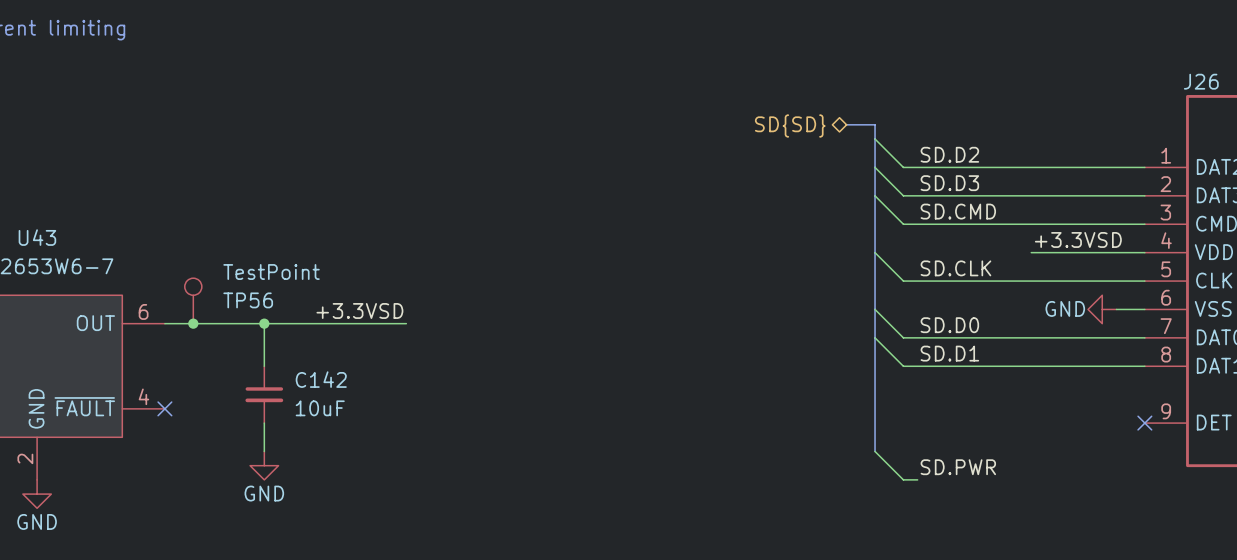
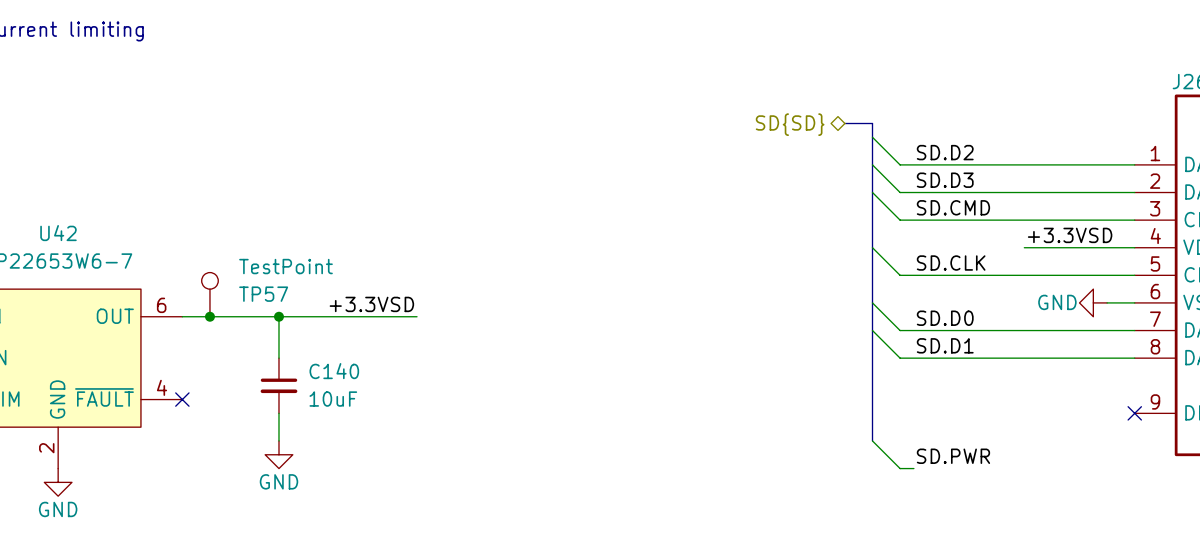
U43 name: U43 (37, 237) -> U42 (58, 233)
TP56 name: TP56 (248, 300) -> TP57 (263, 294)
C142 name: C142 (321, 379) -> C140 (334, 371)

